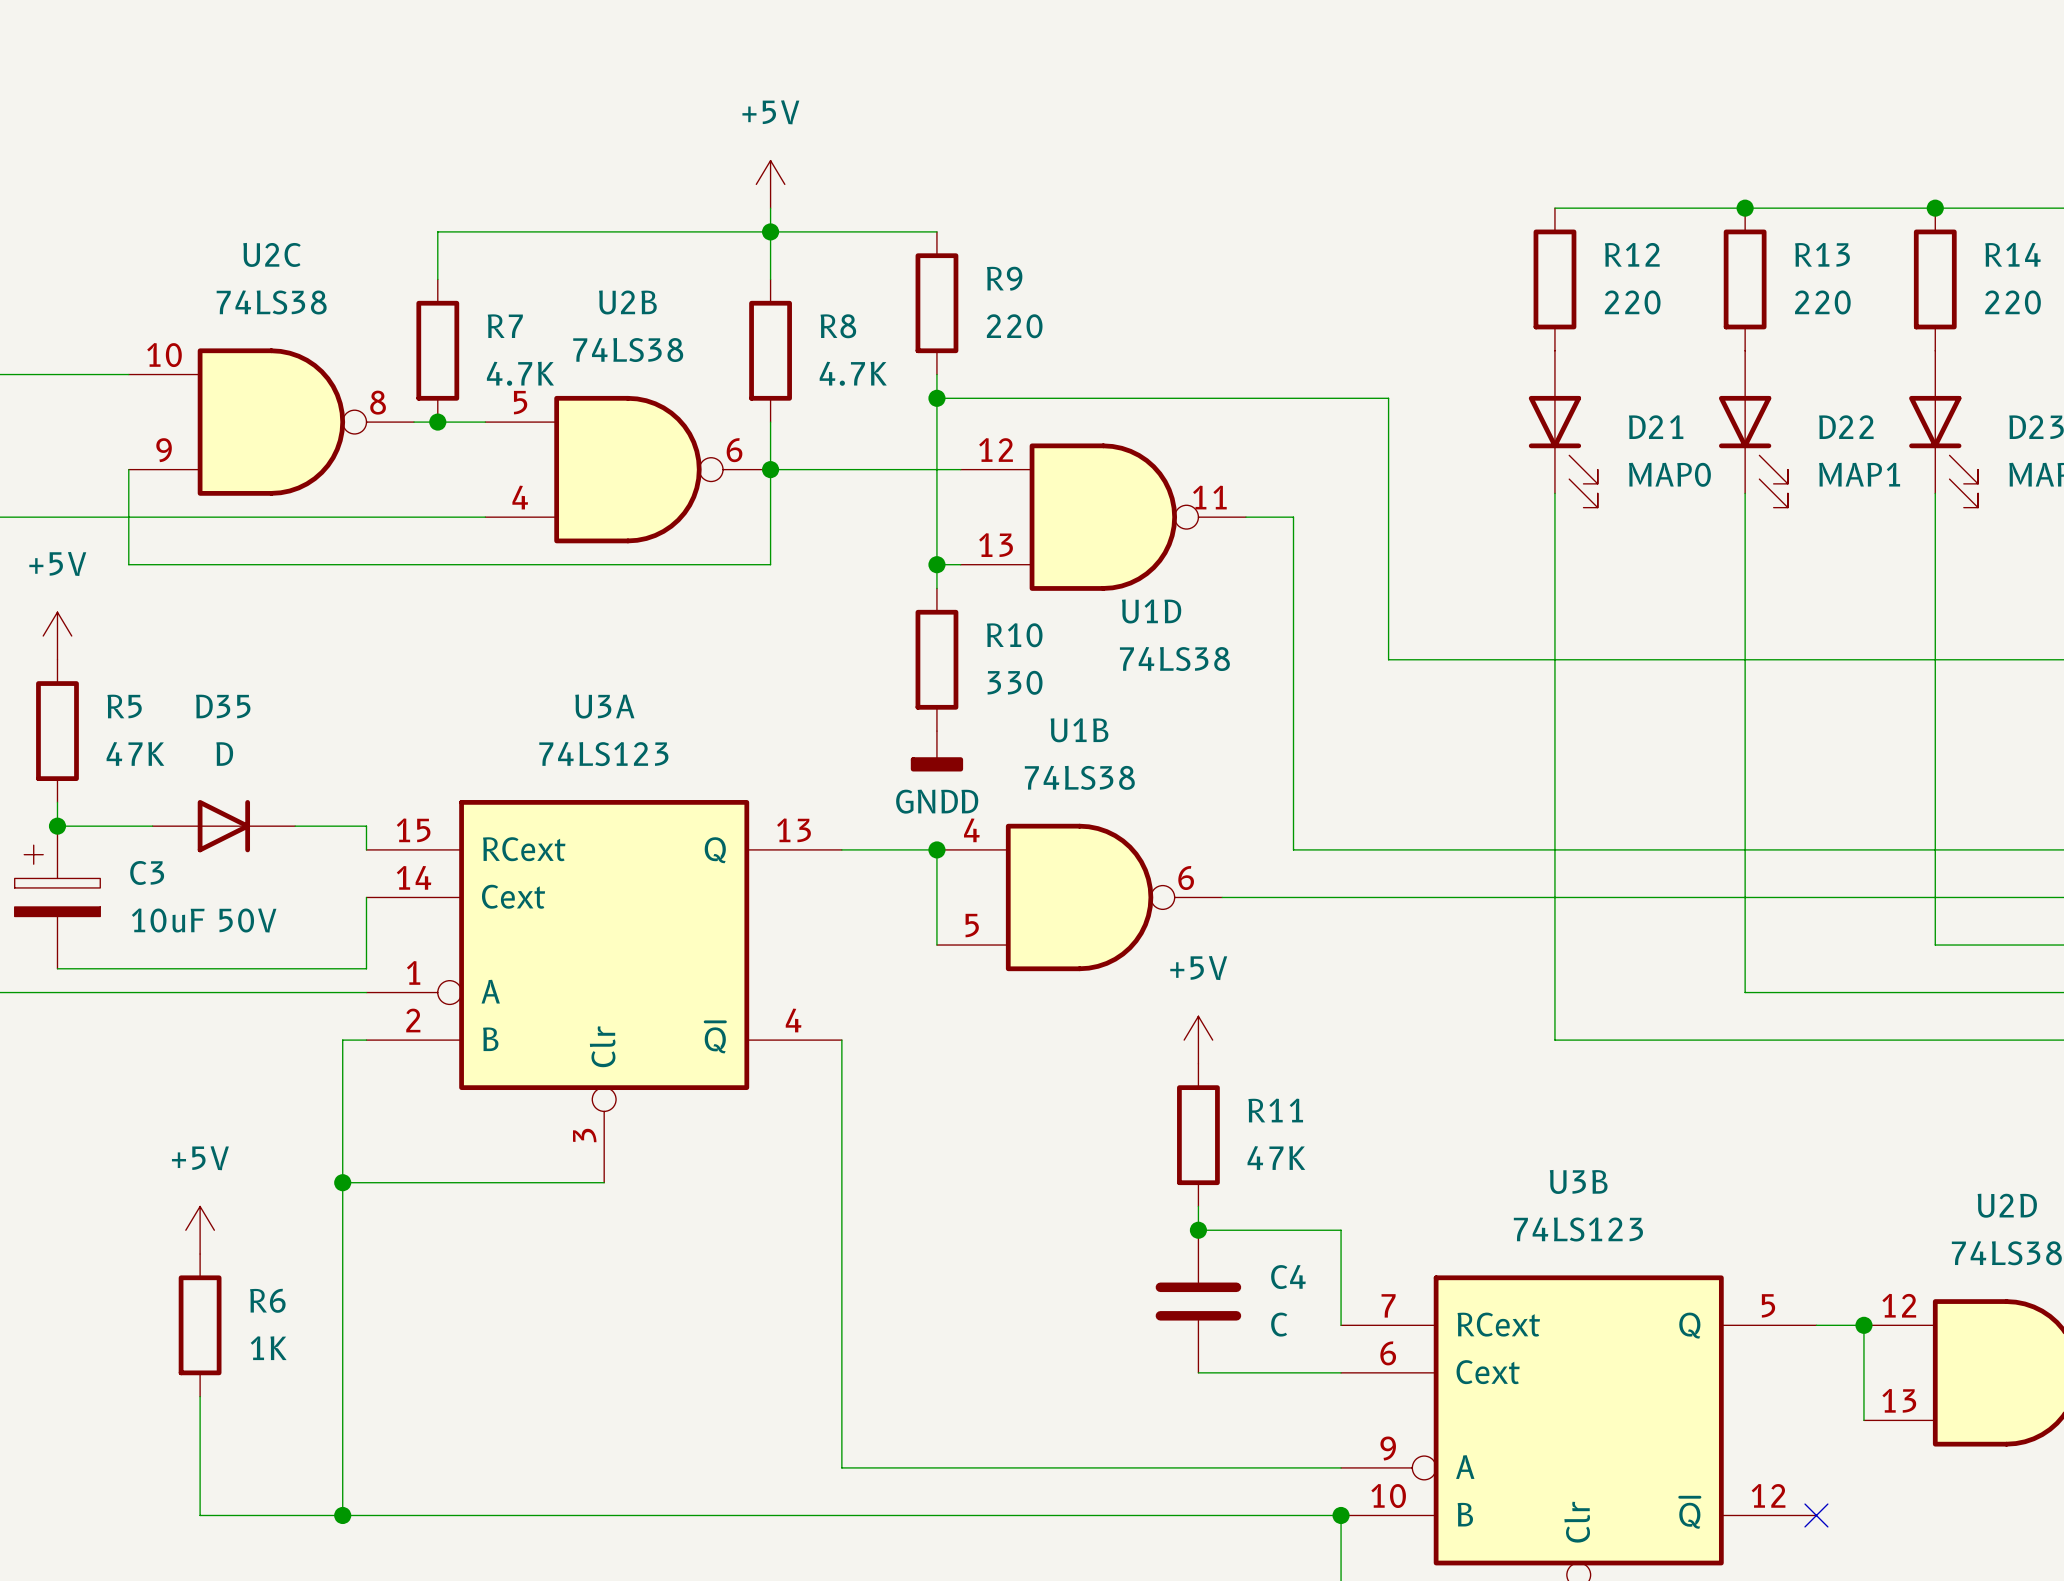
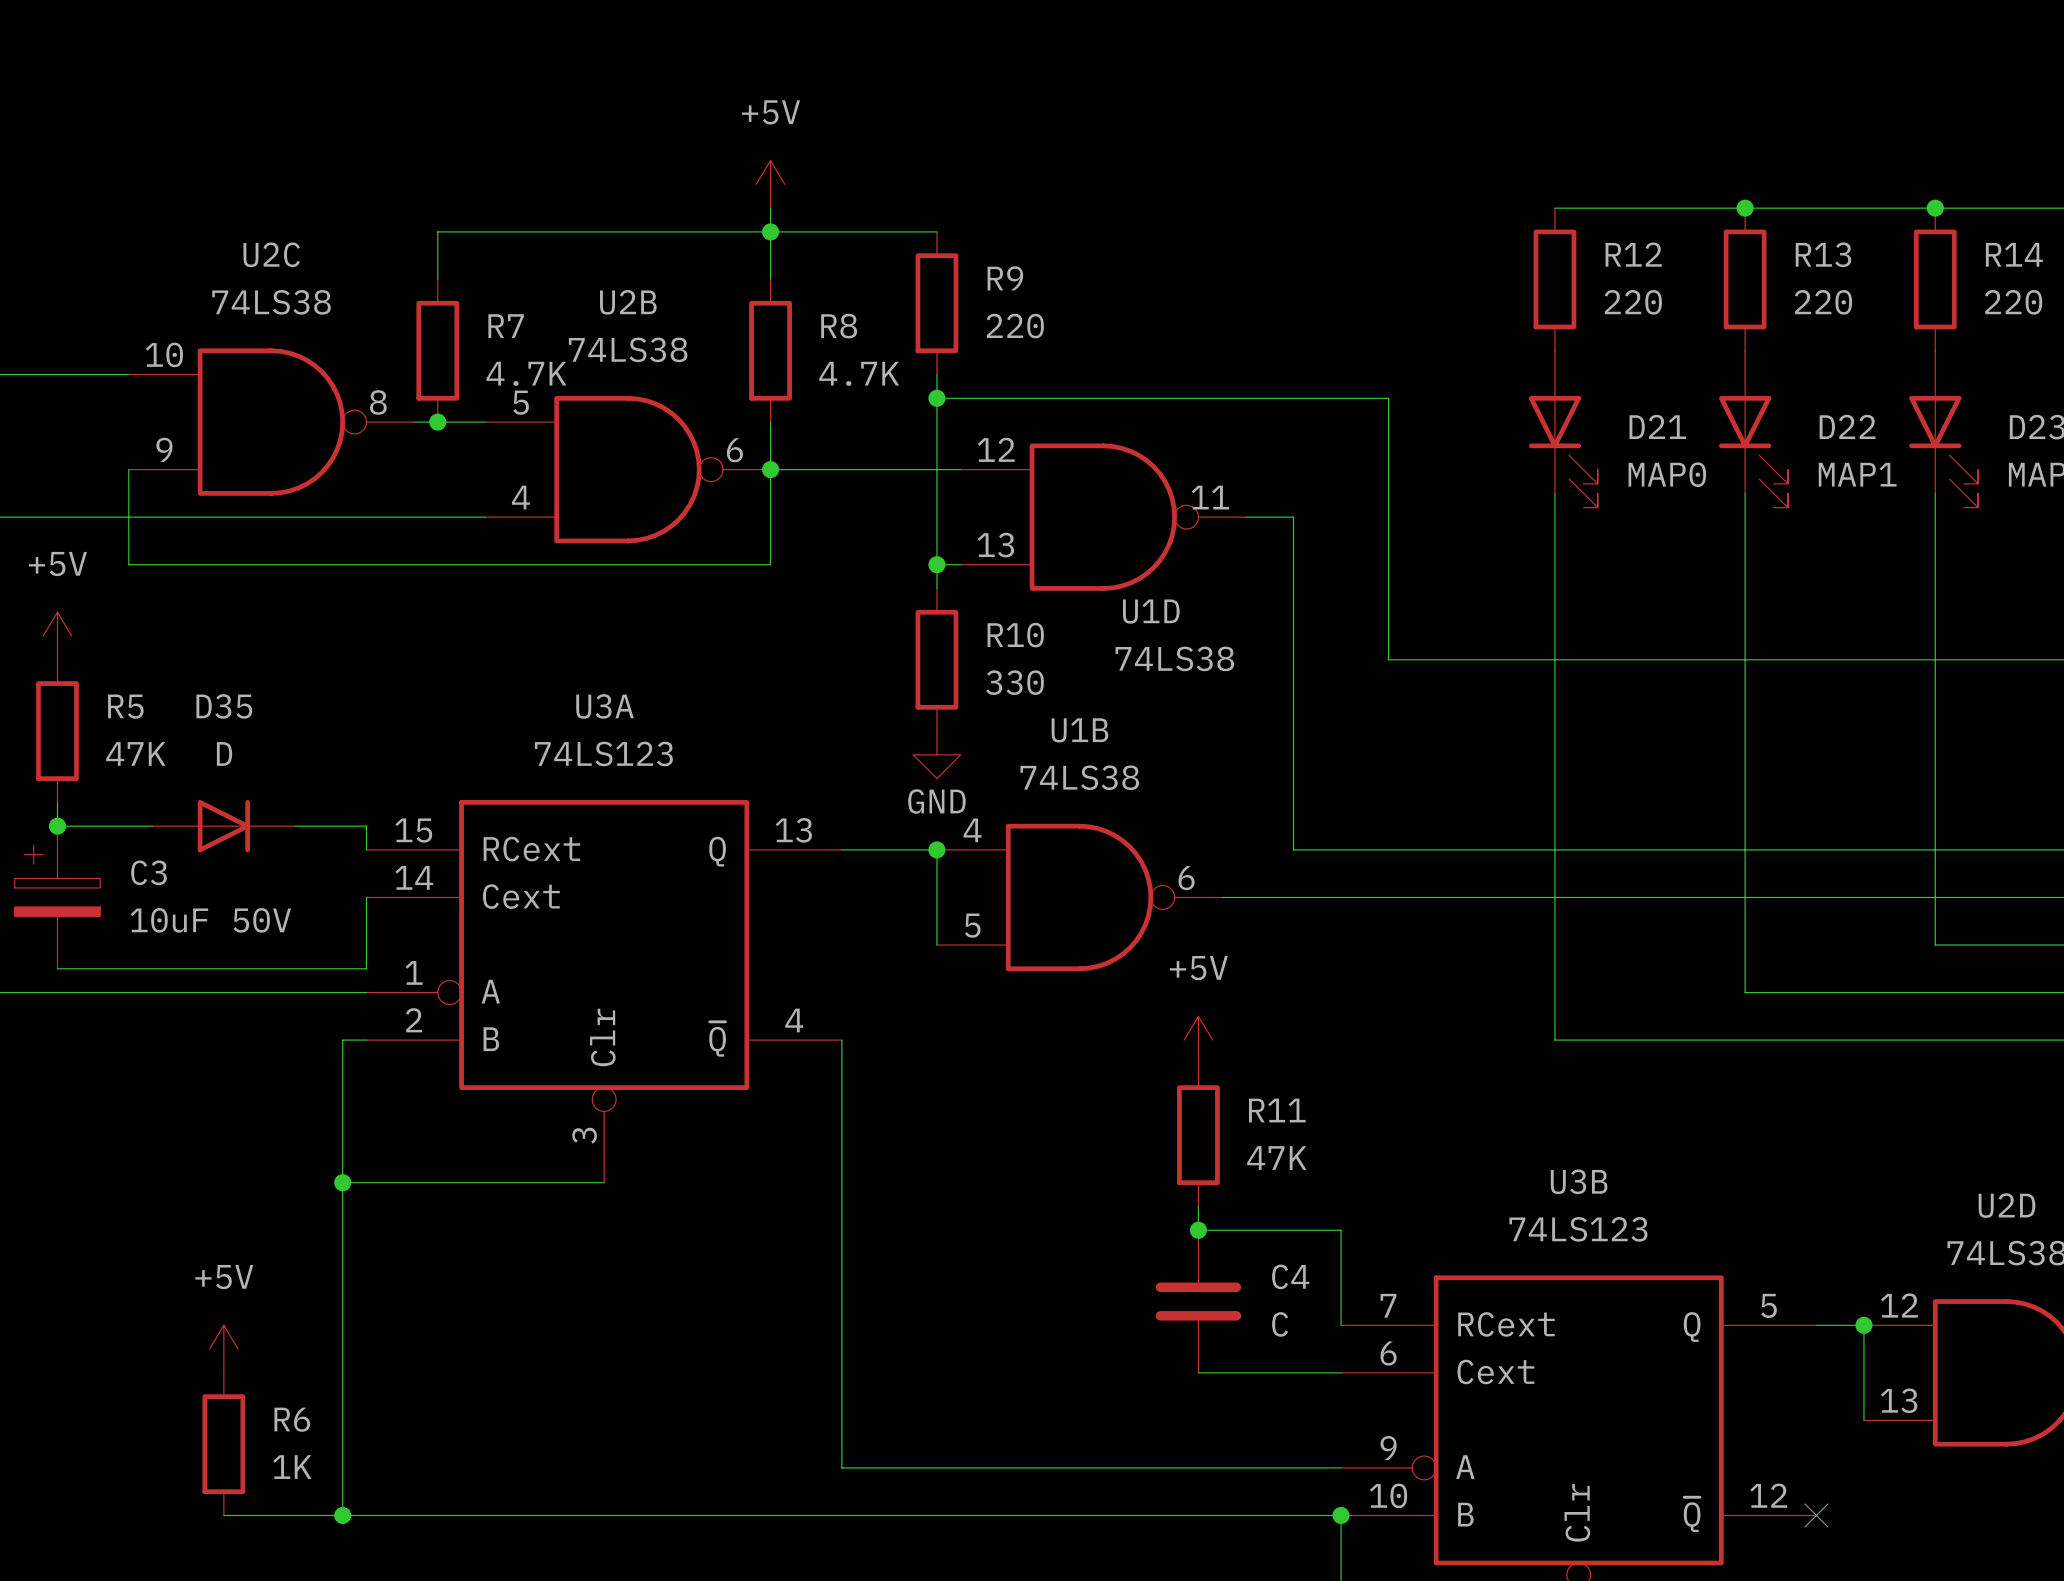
power symbol: GNDD (936, 751) -> GND (936, 754)
power symbol position: +5V (200, 1230) -> +5V (223, 1349)
R6 position: (200, 1325) -> (223, 1444)
wire: (200, 1396) (200, 1515) (223, 1515) -> none

